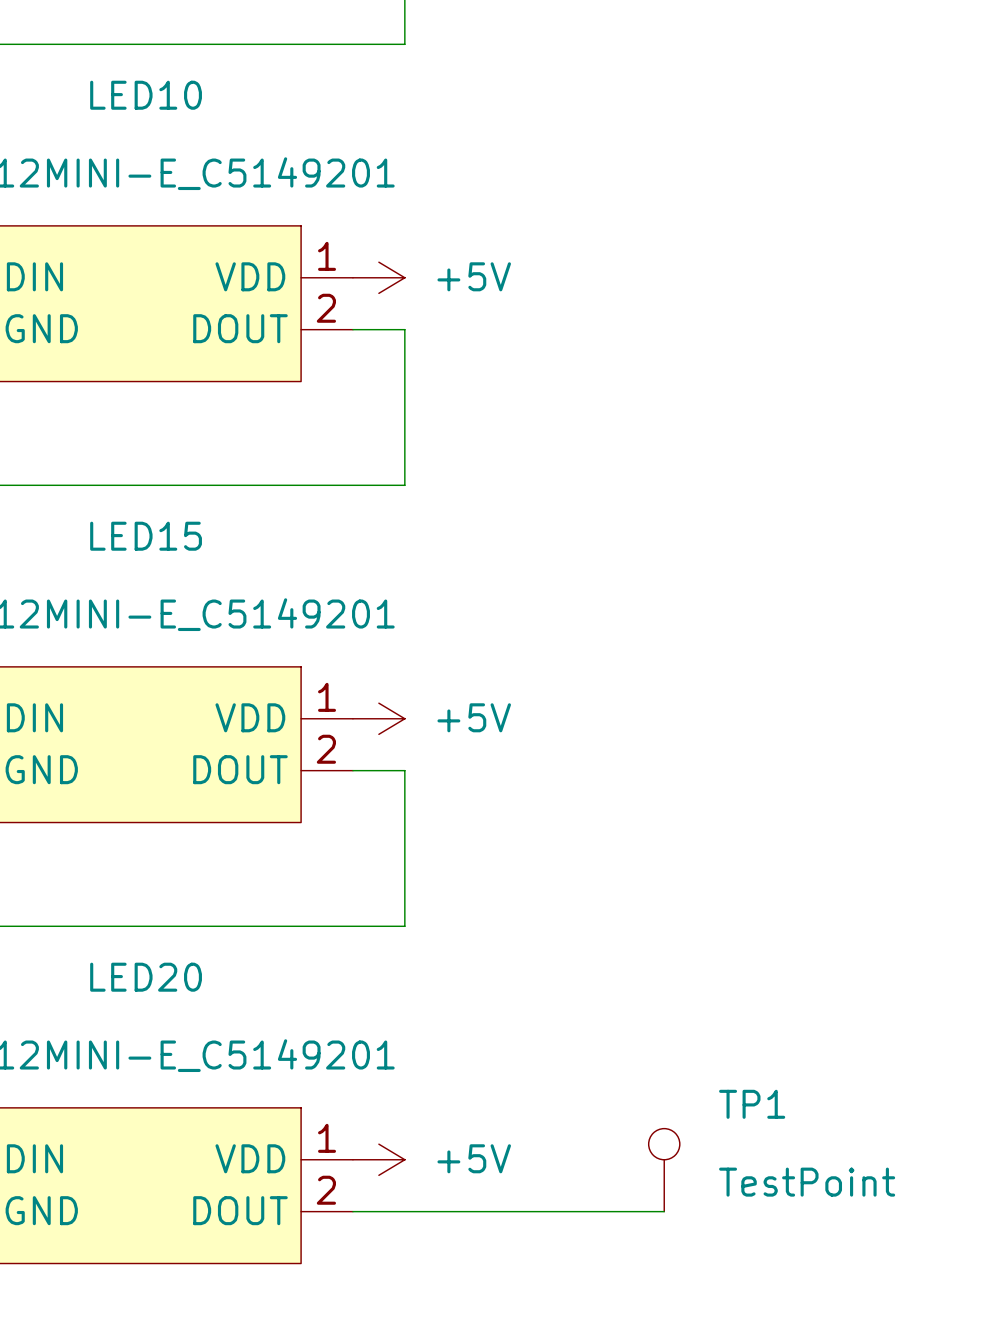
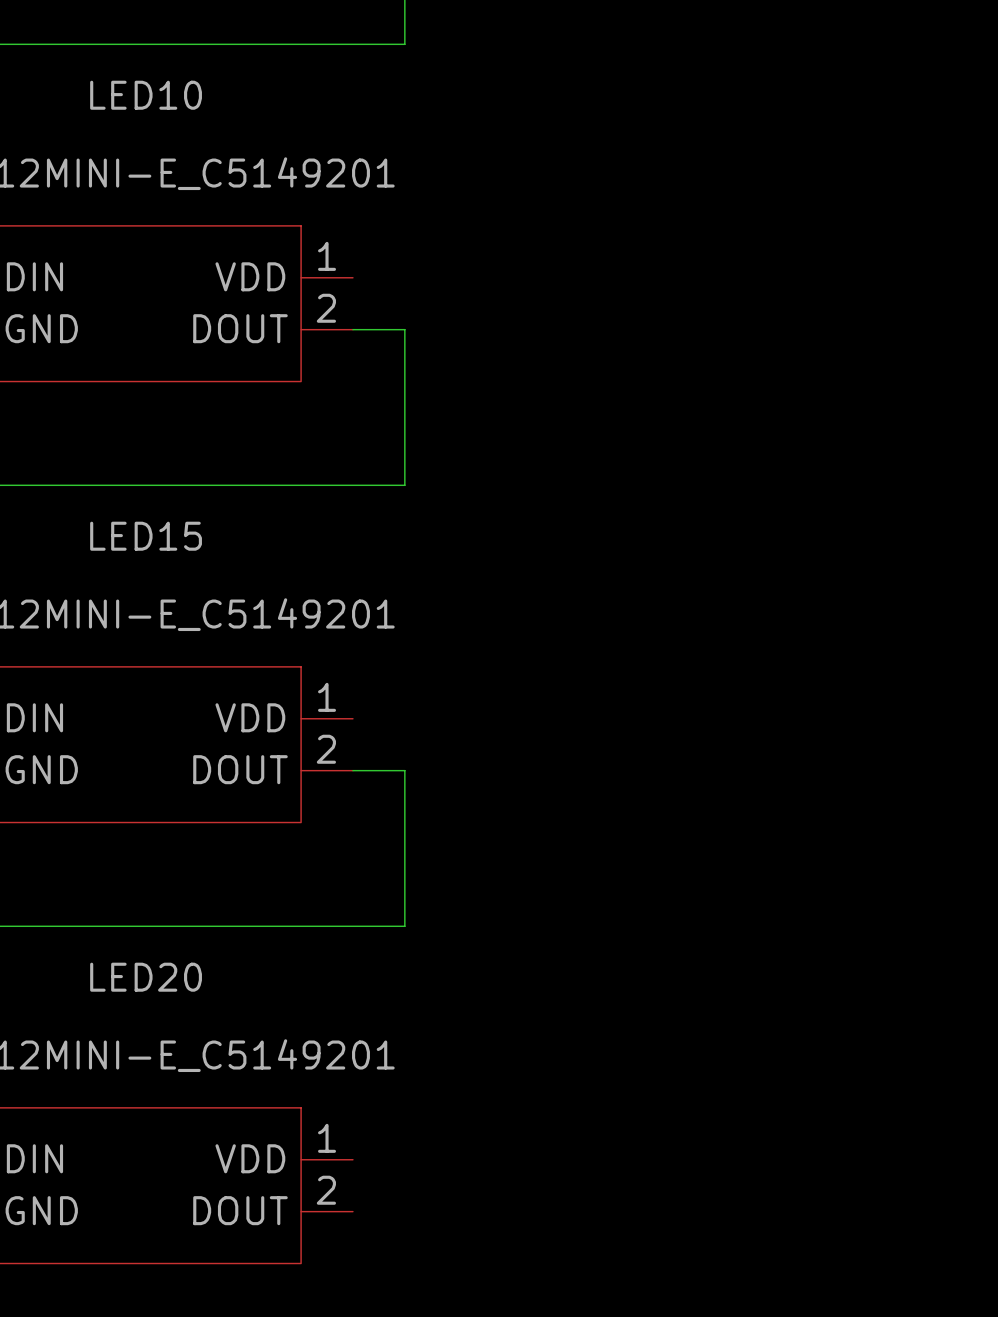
power symbol: +5V (378, 277) -> none
power symbol: +5V (378, 718) -> none
power symbol: +5V (378, 1159) -> none
TP1: TestPoint (664, 1170) -> none
wire: (352, 1211) (664, 1211) -> none

